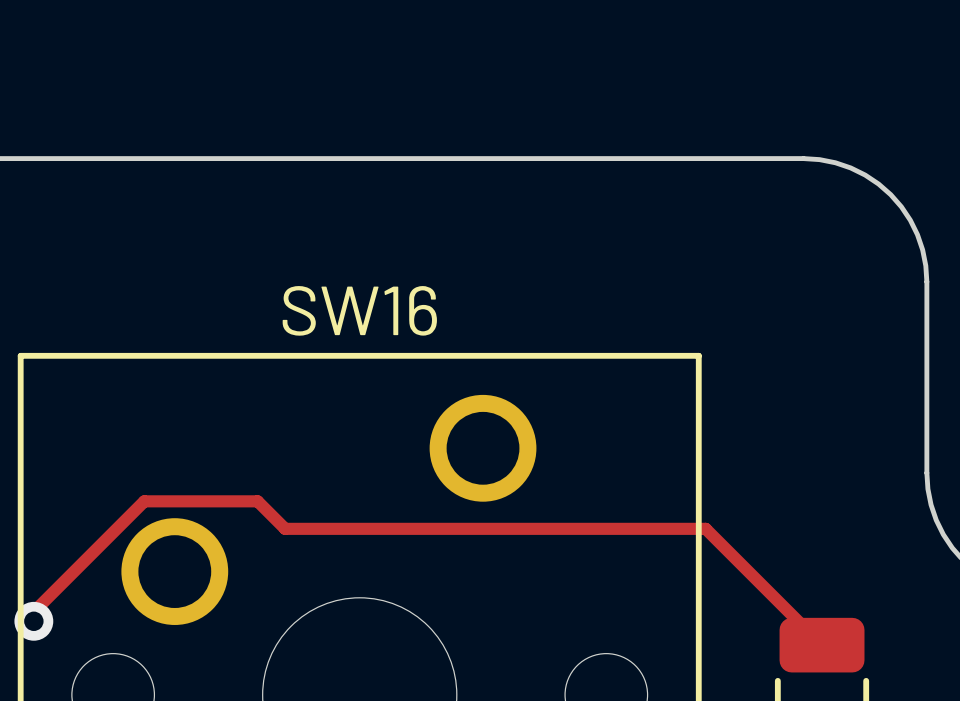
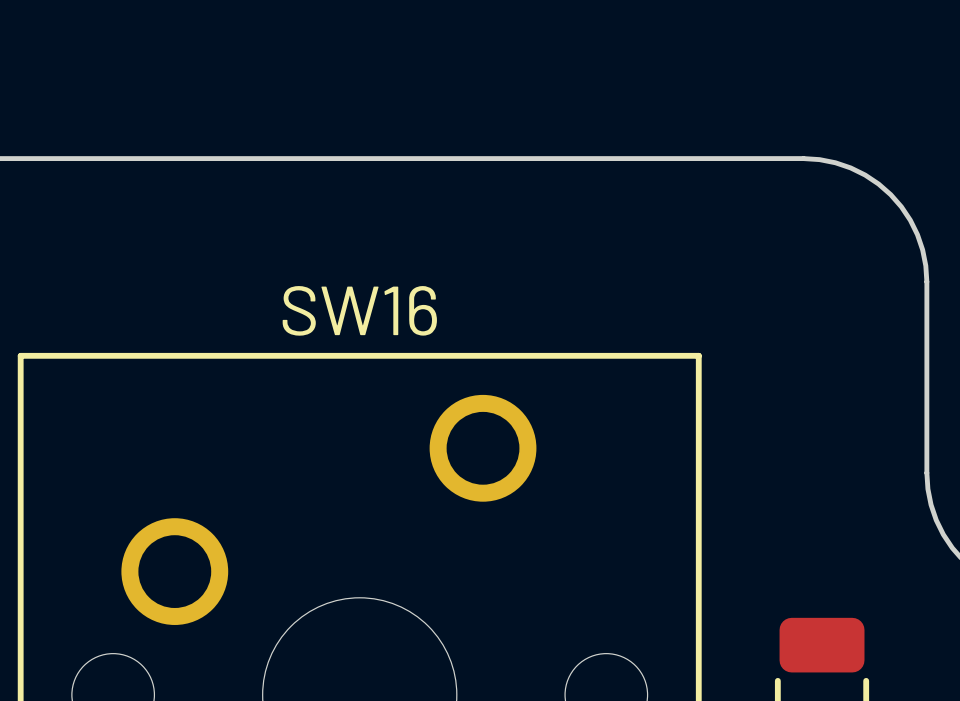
track: (33, 621) (33, 611) (144, 501) (257, 501) (285, 528) (705, 528) (822, 645) -> none
via: (33, 621) -> none

